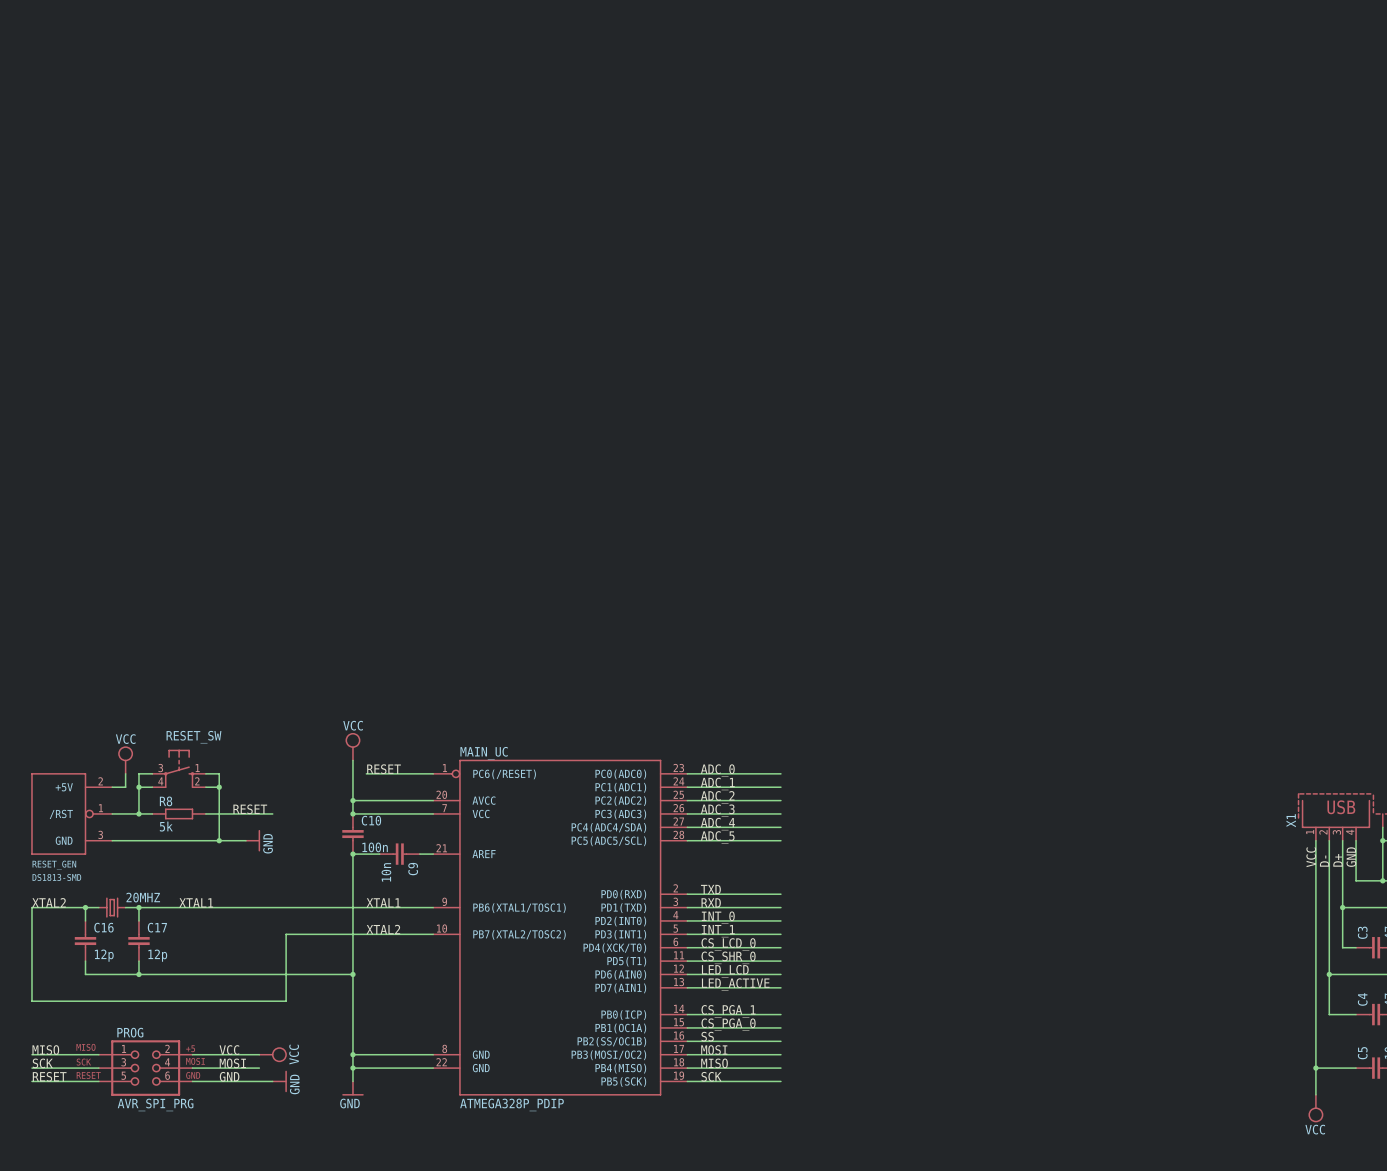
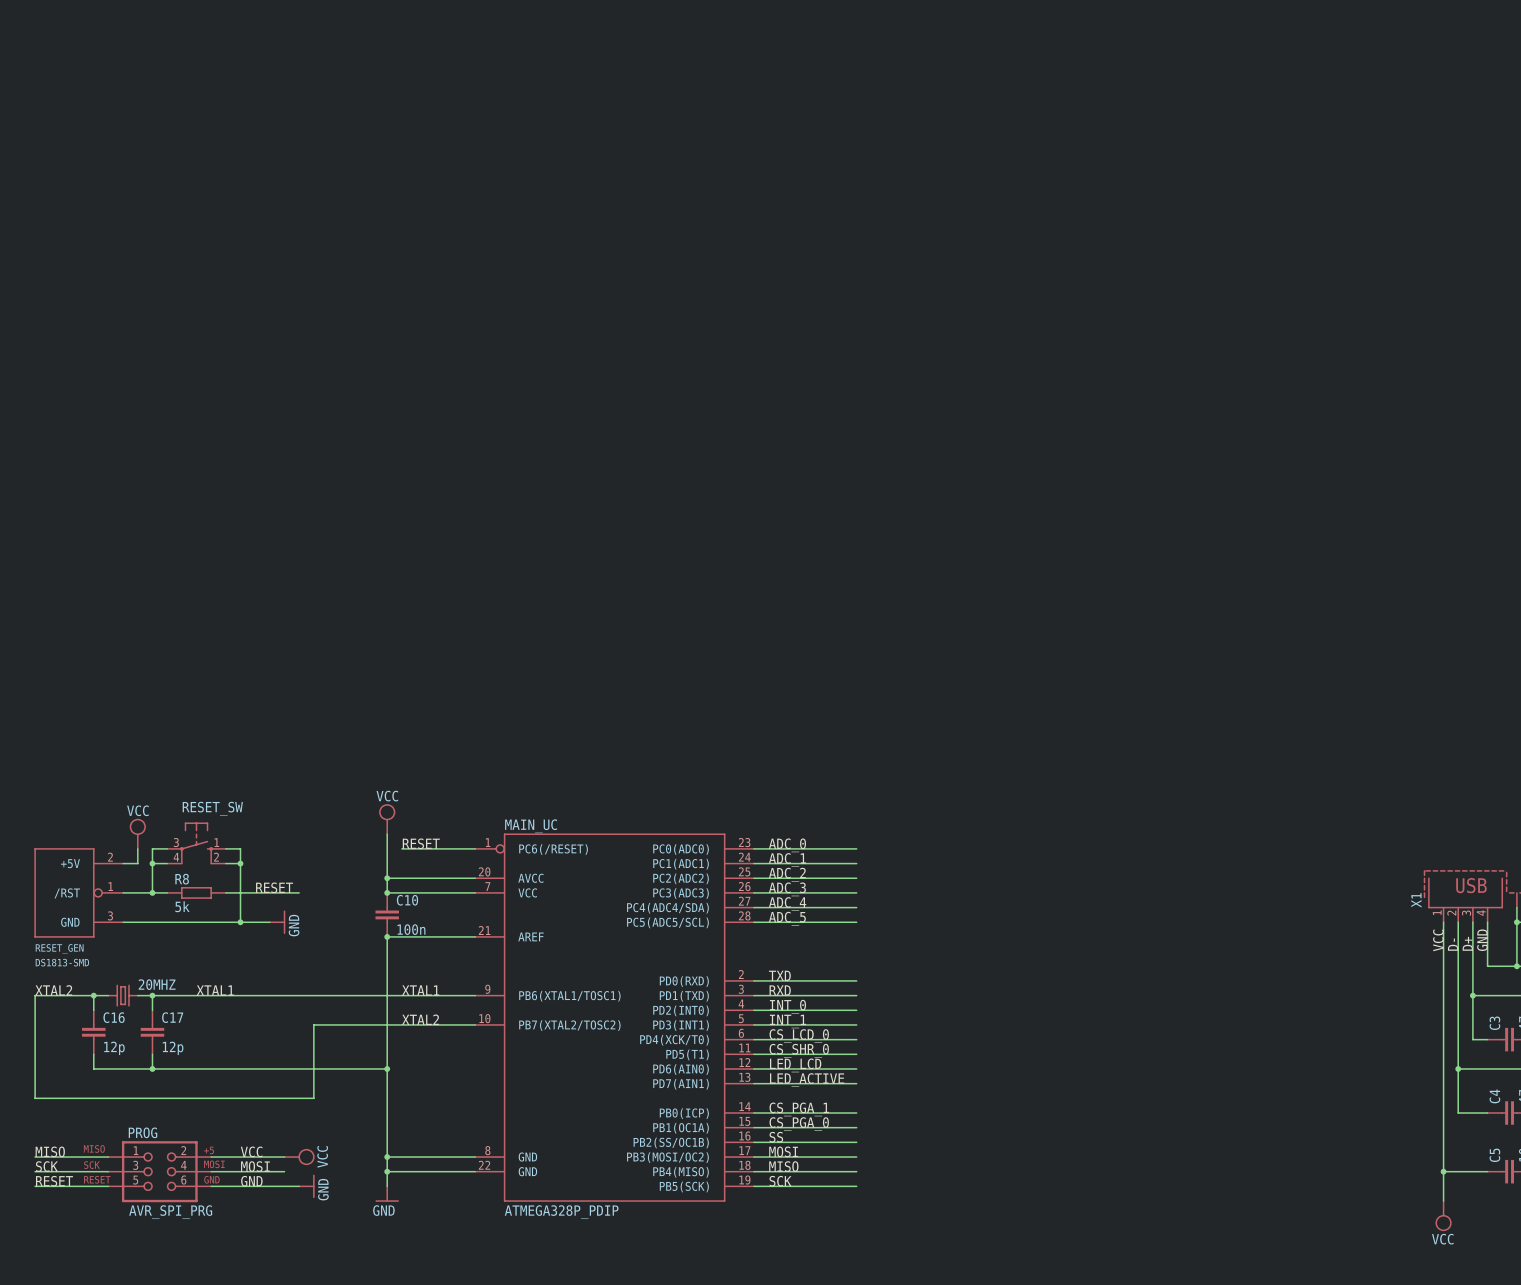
C9: 10n (399, 854) -> none

